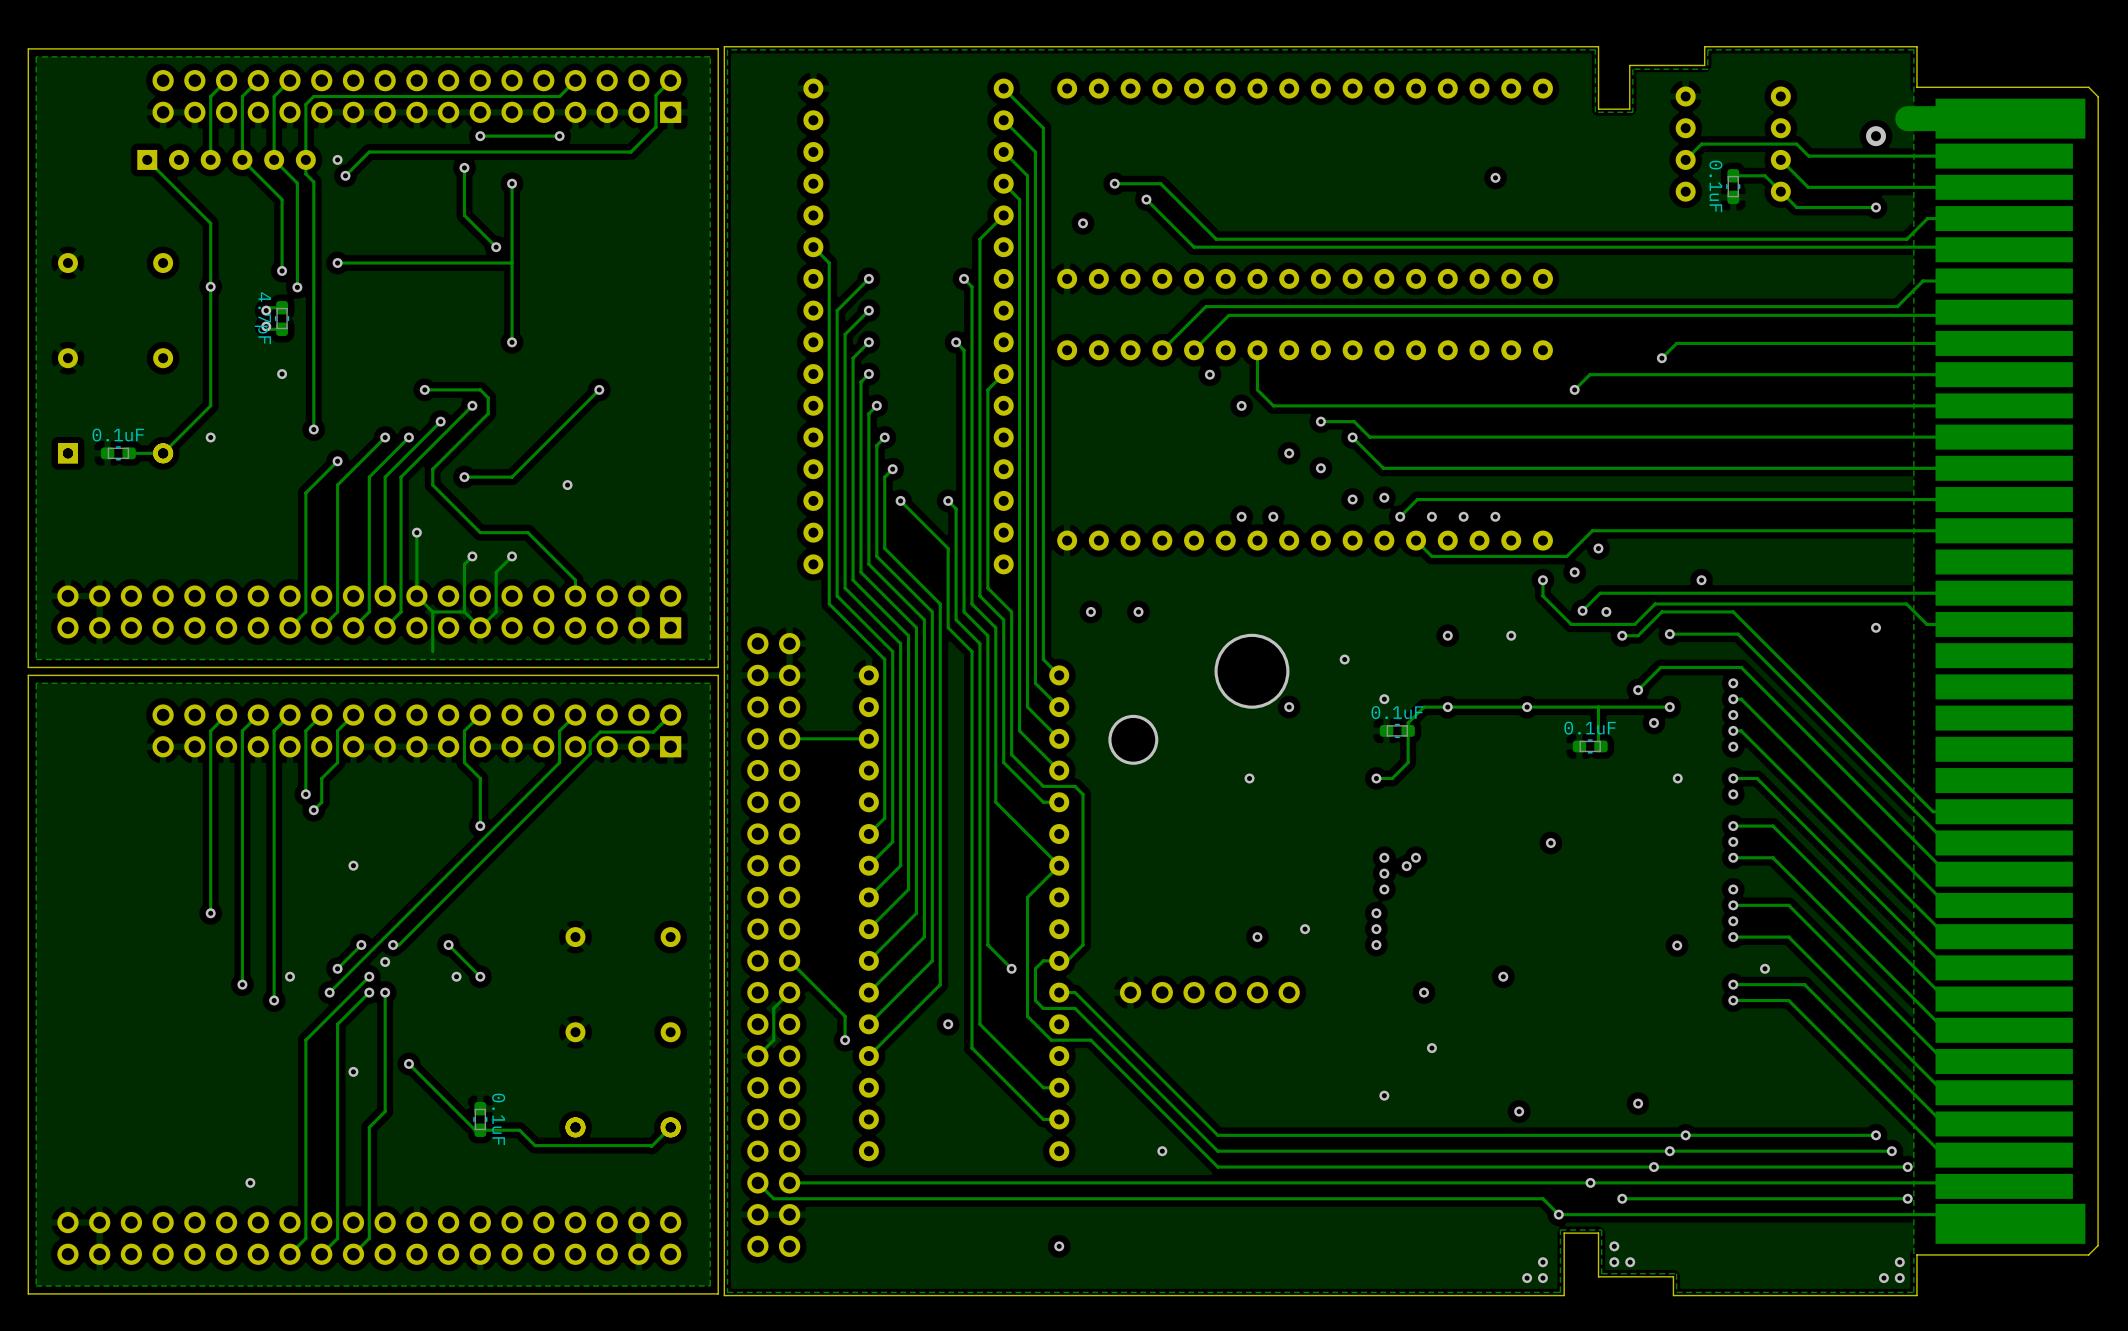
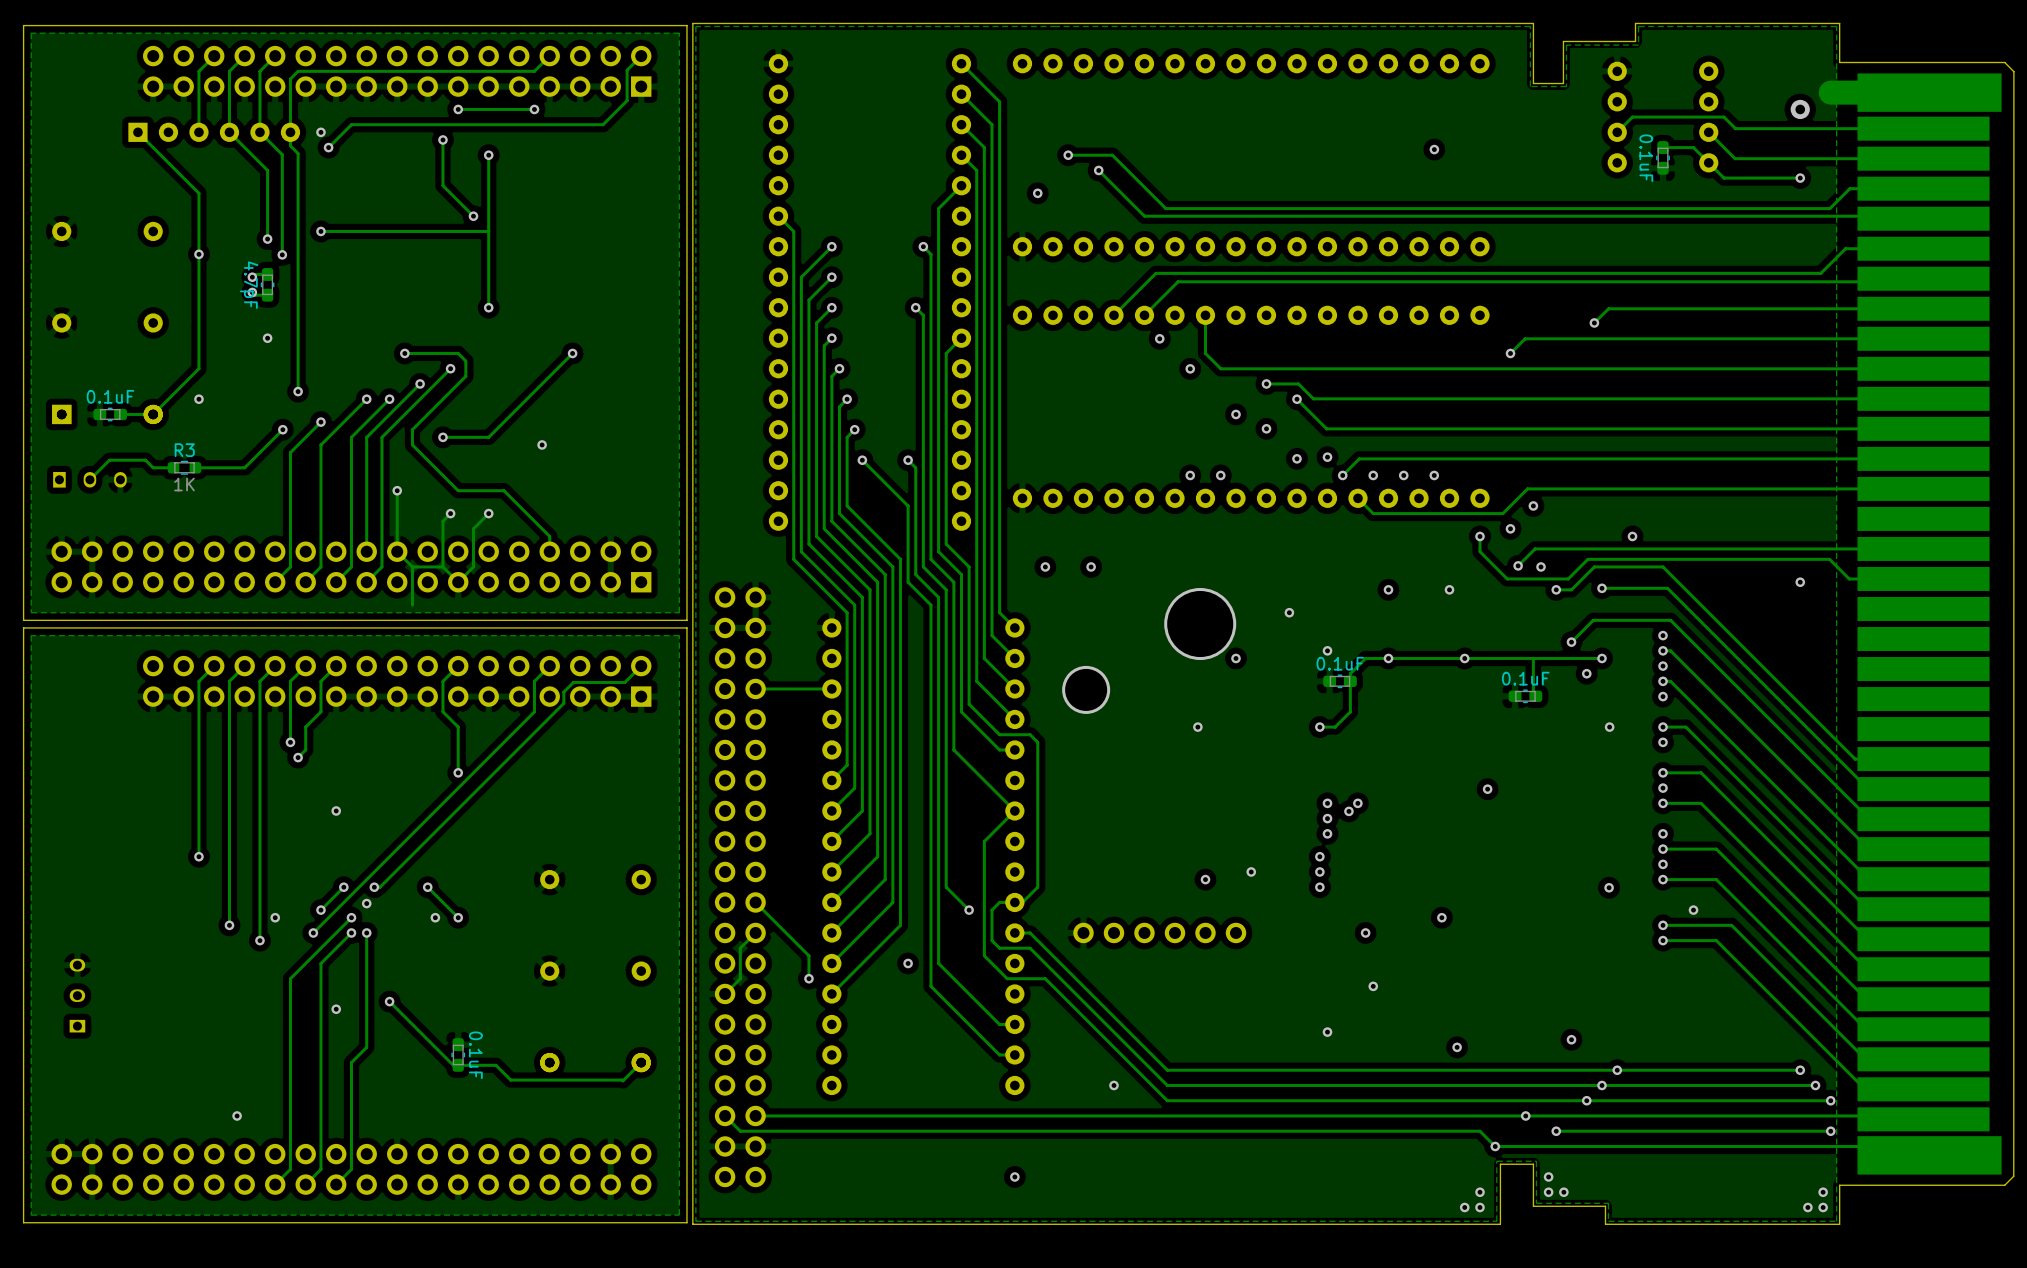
track: none -> (282, 429) (244, 467) (195, 467)
via: none -> (282, 429)
track: none -> (173, 467) (153, 467) (145, 460) (109, 460) (89, 479)
R3: none -> 1K (184, 467)
part: none -> (89, 479)
part: none -> (77, 995)

